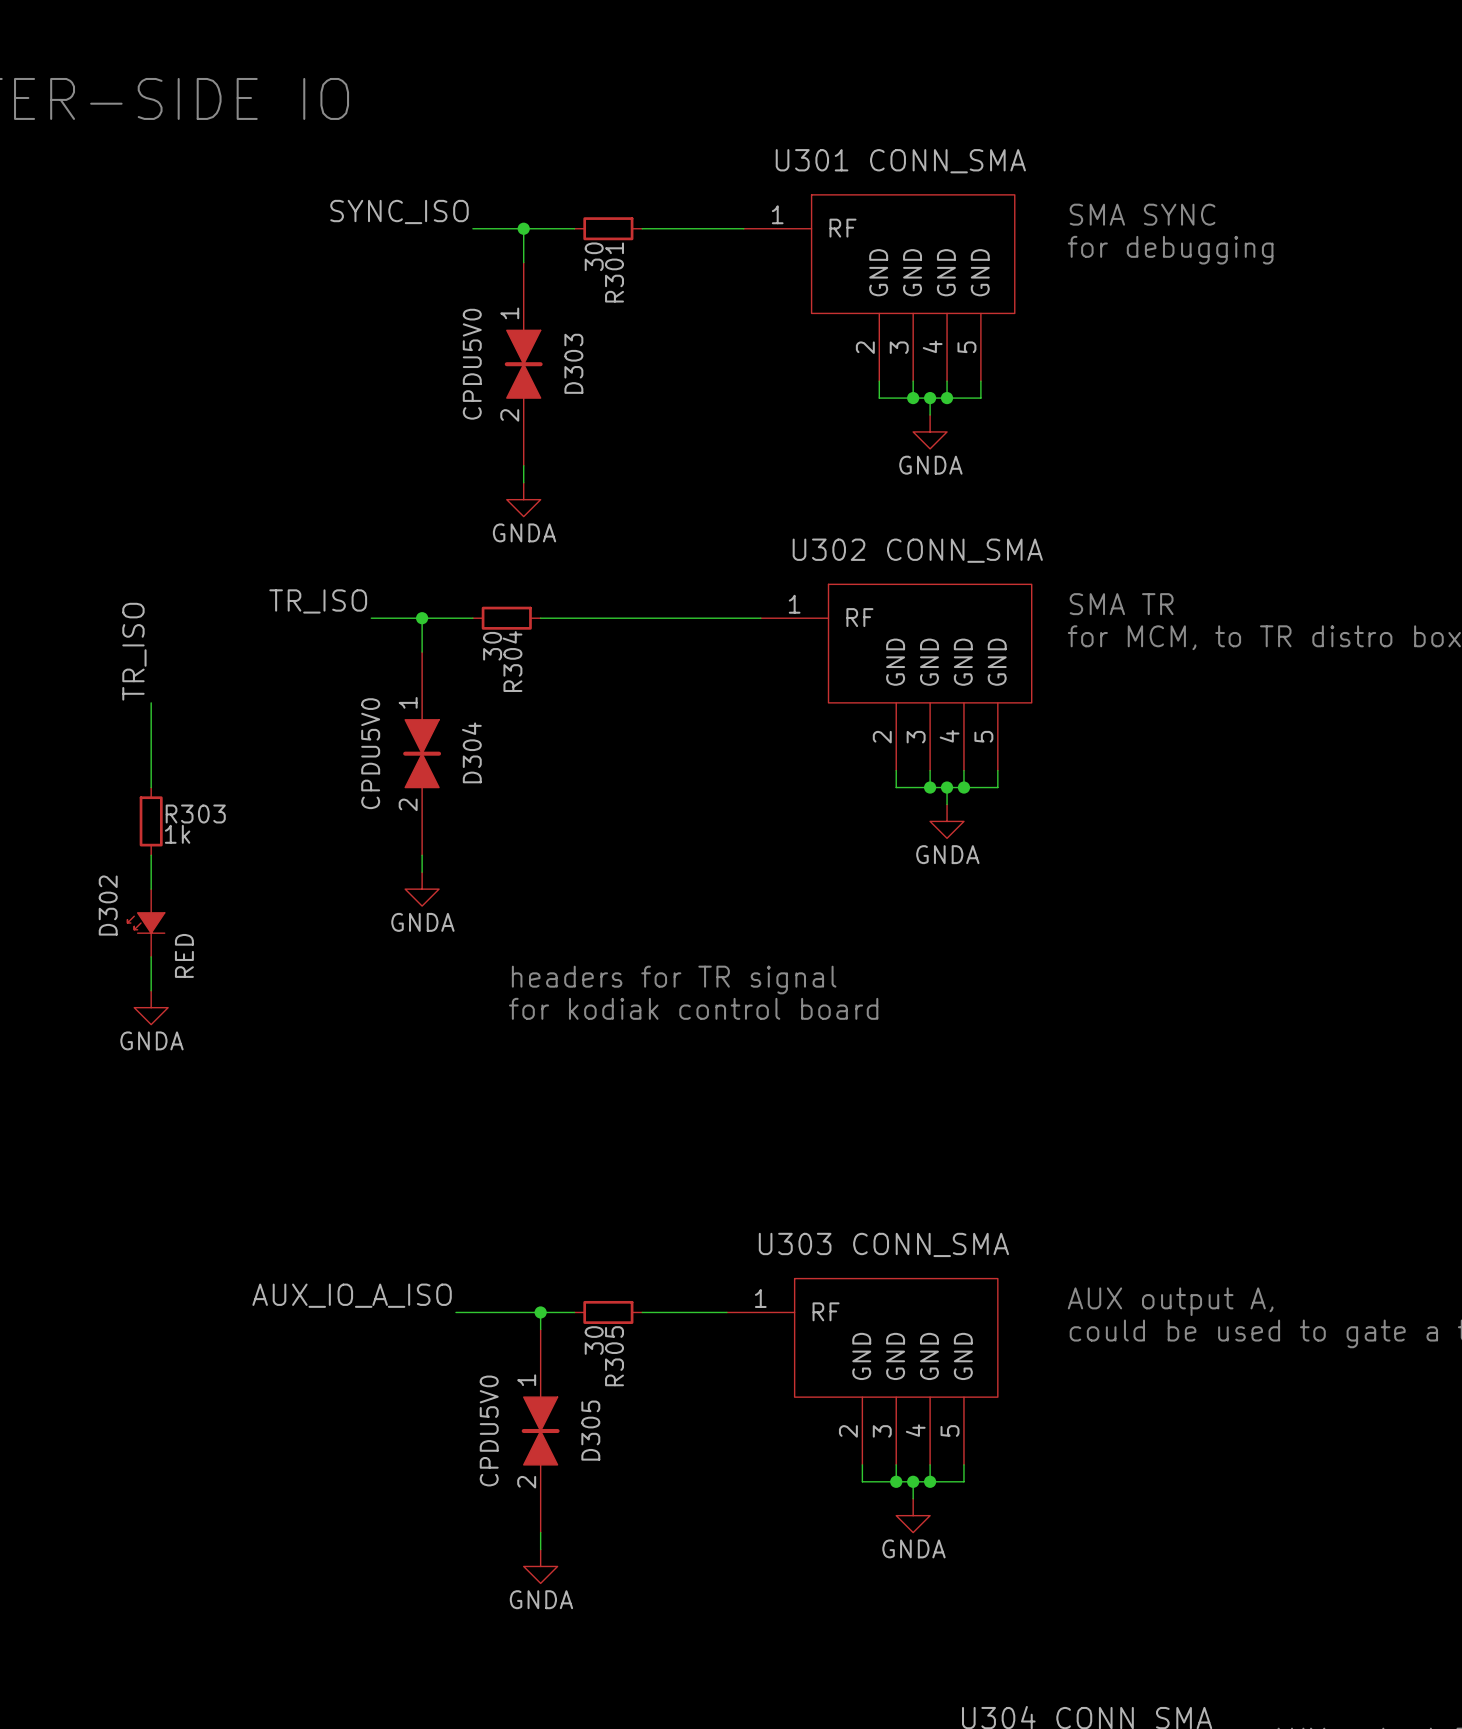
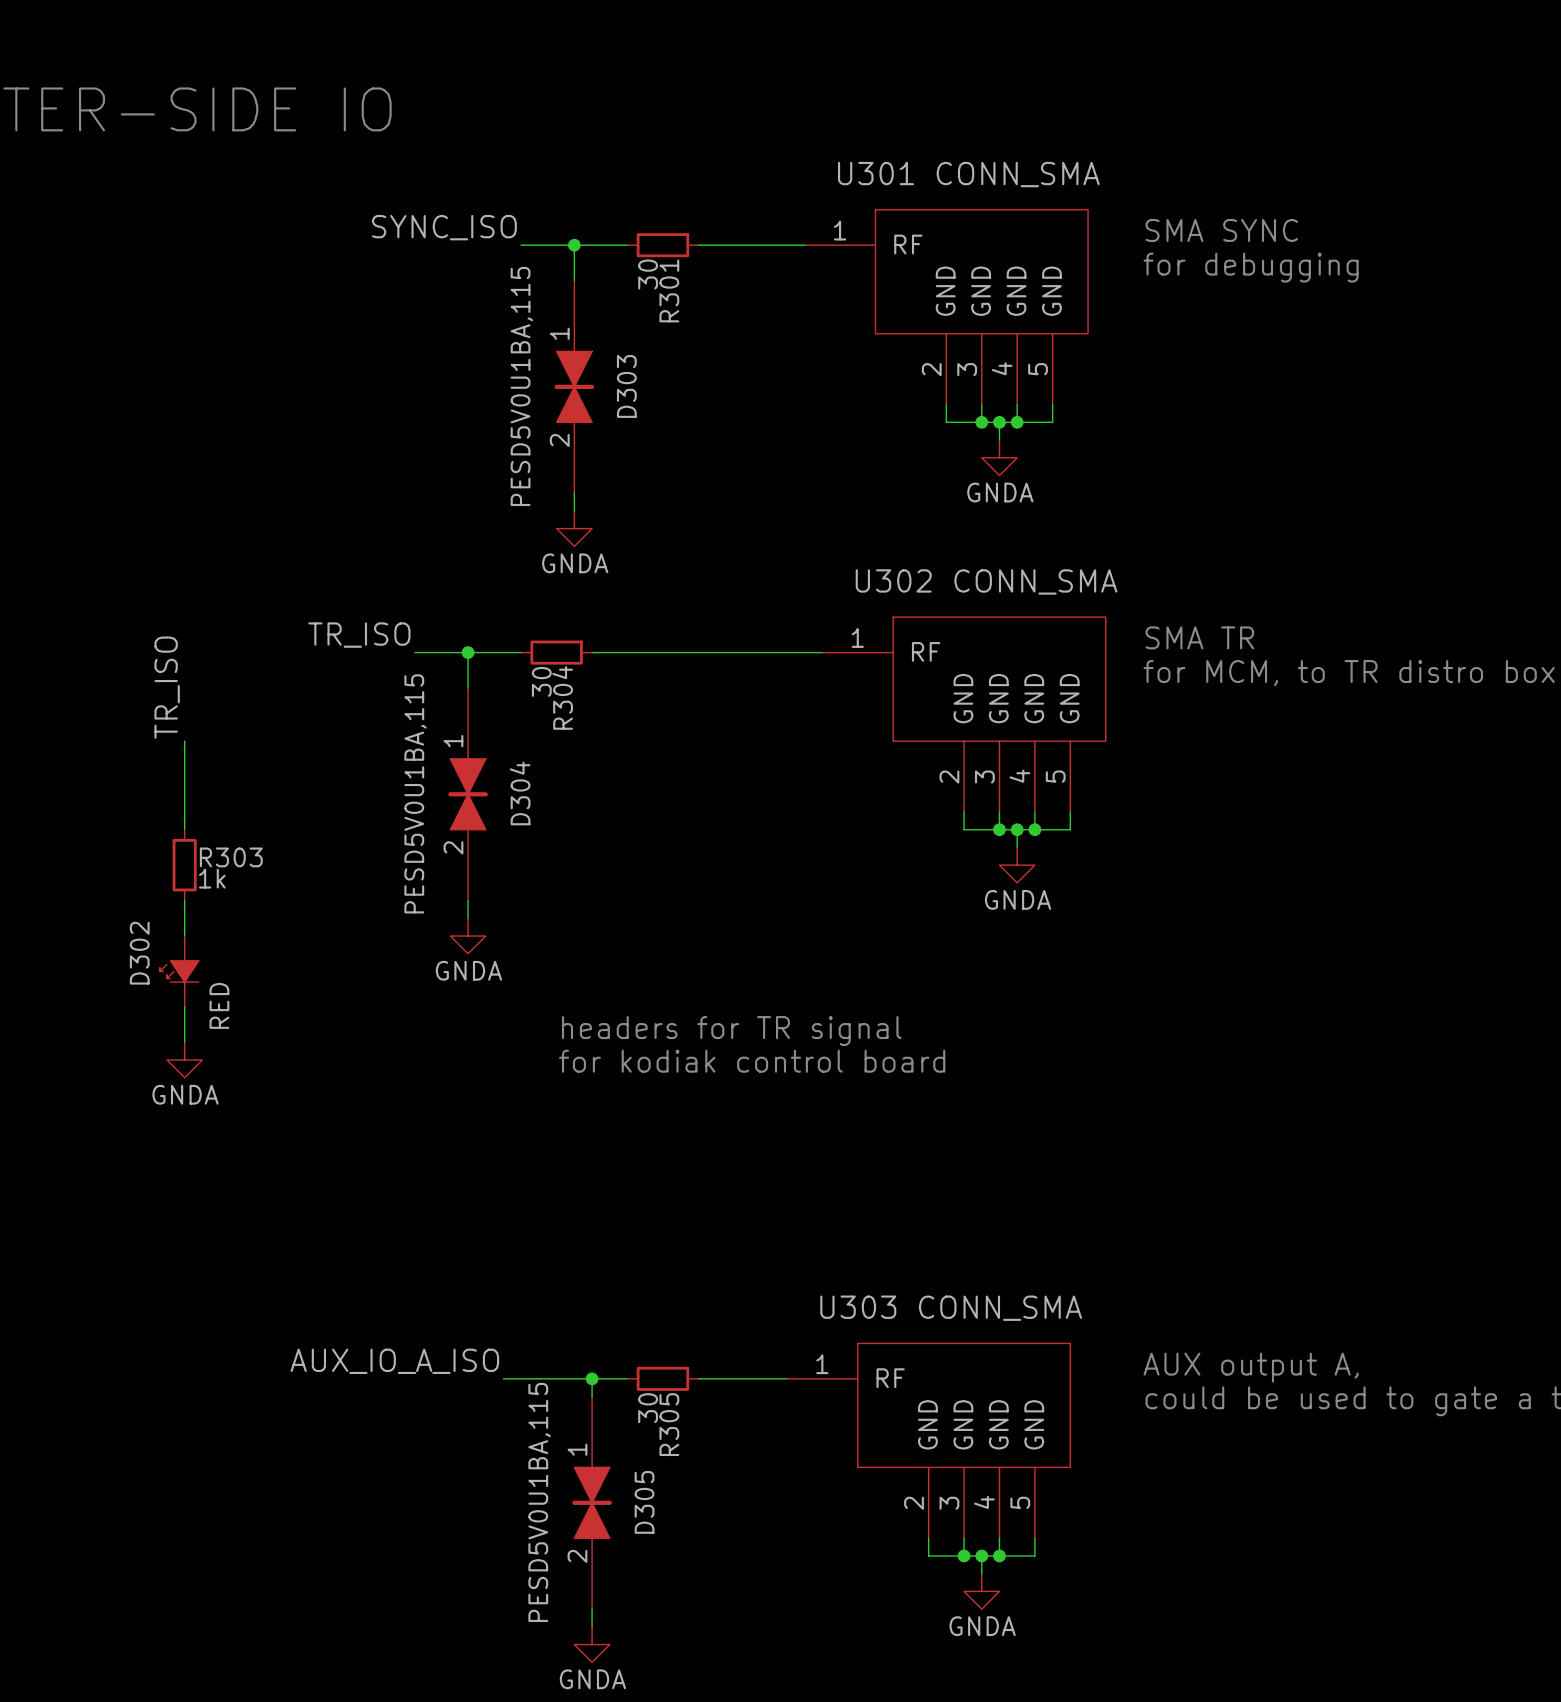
D303 value: CPDU5V0 (472, 364) -> PESD5V0U1BA,115 (521, 386)
D304 value: CPDU5V0 (370, 753) -> PESD5V0U1BA,115 (415, 793)
D305 value: CPDU5V0 (489, 1431) -> PESD5V0U1BA,115 (539, 1502)

